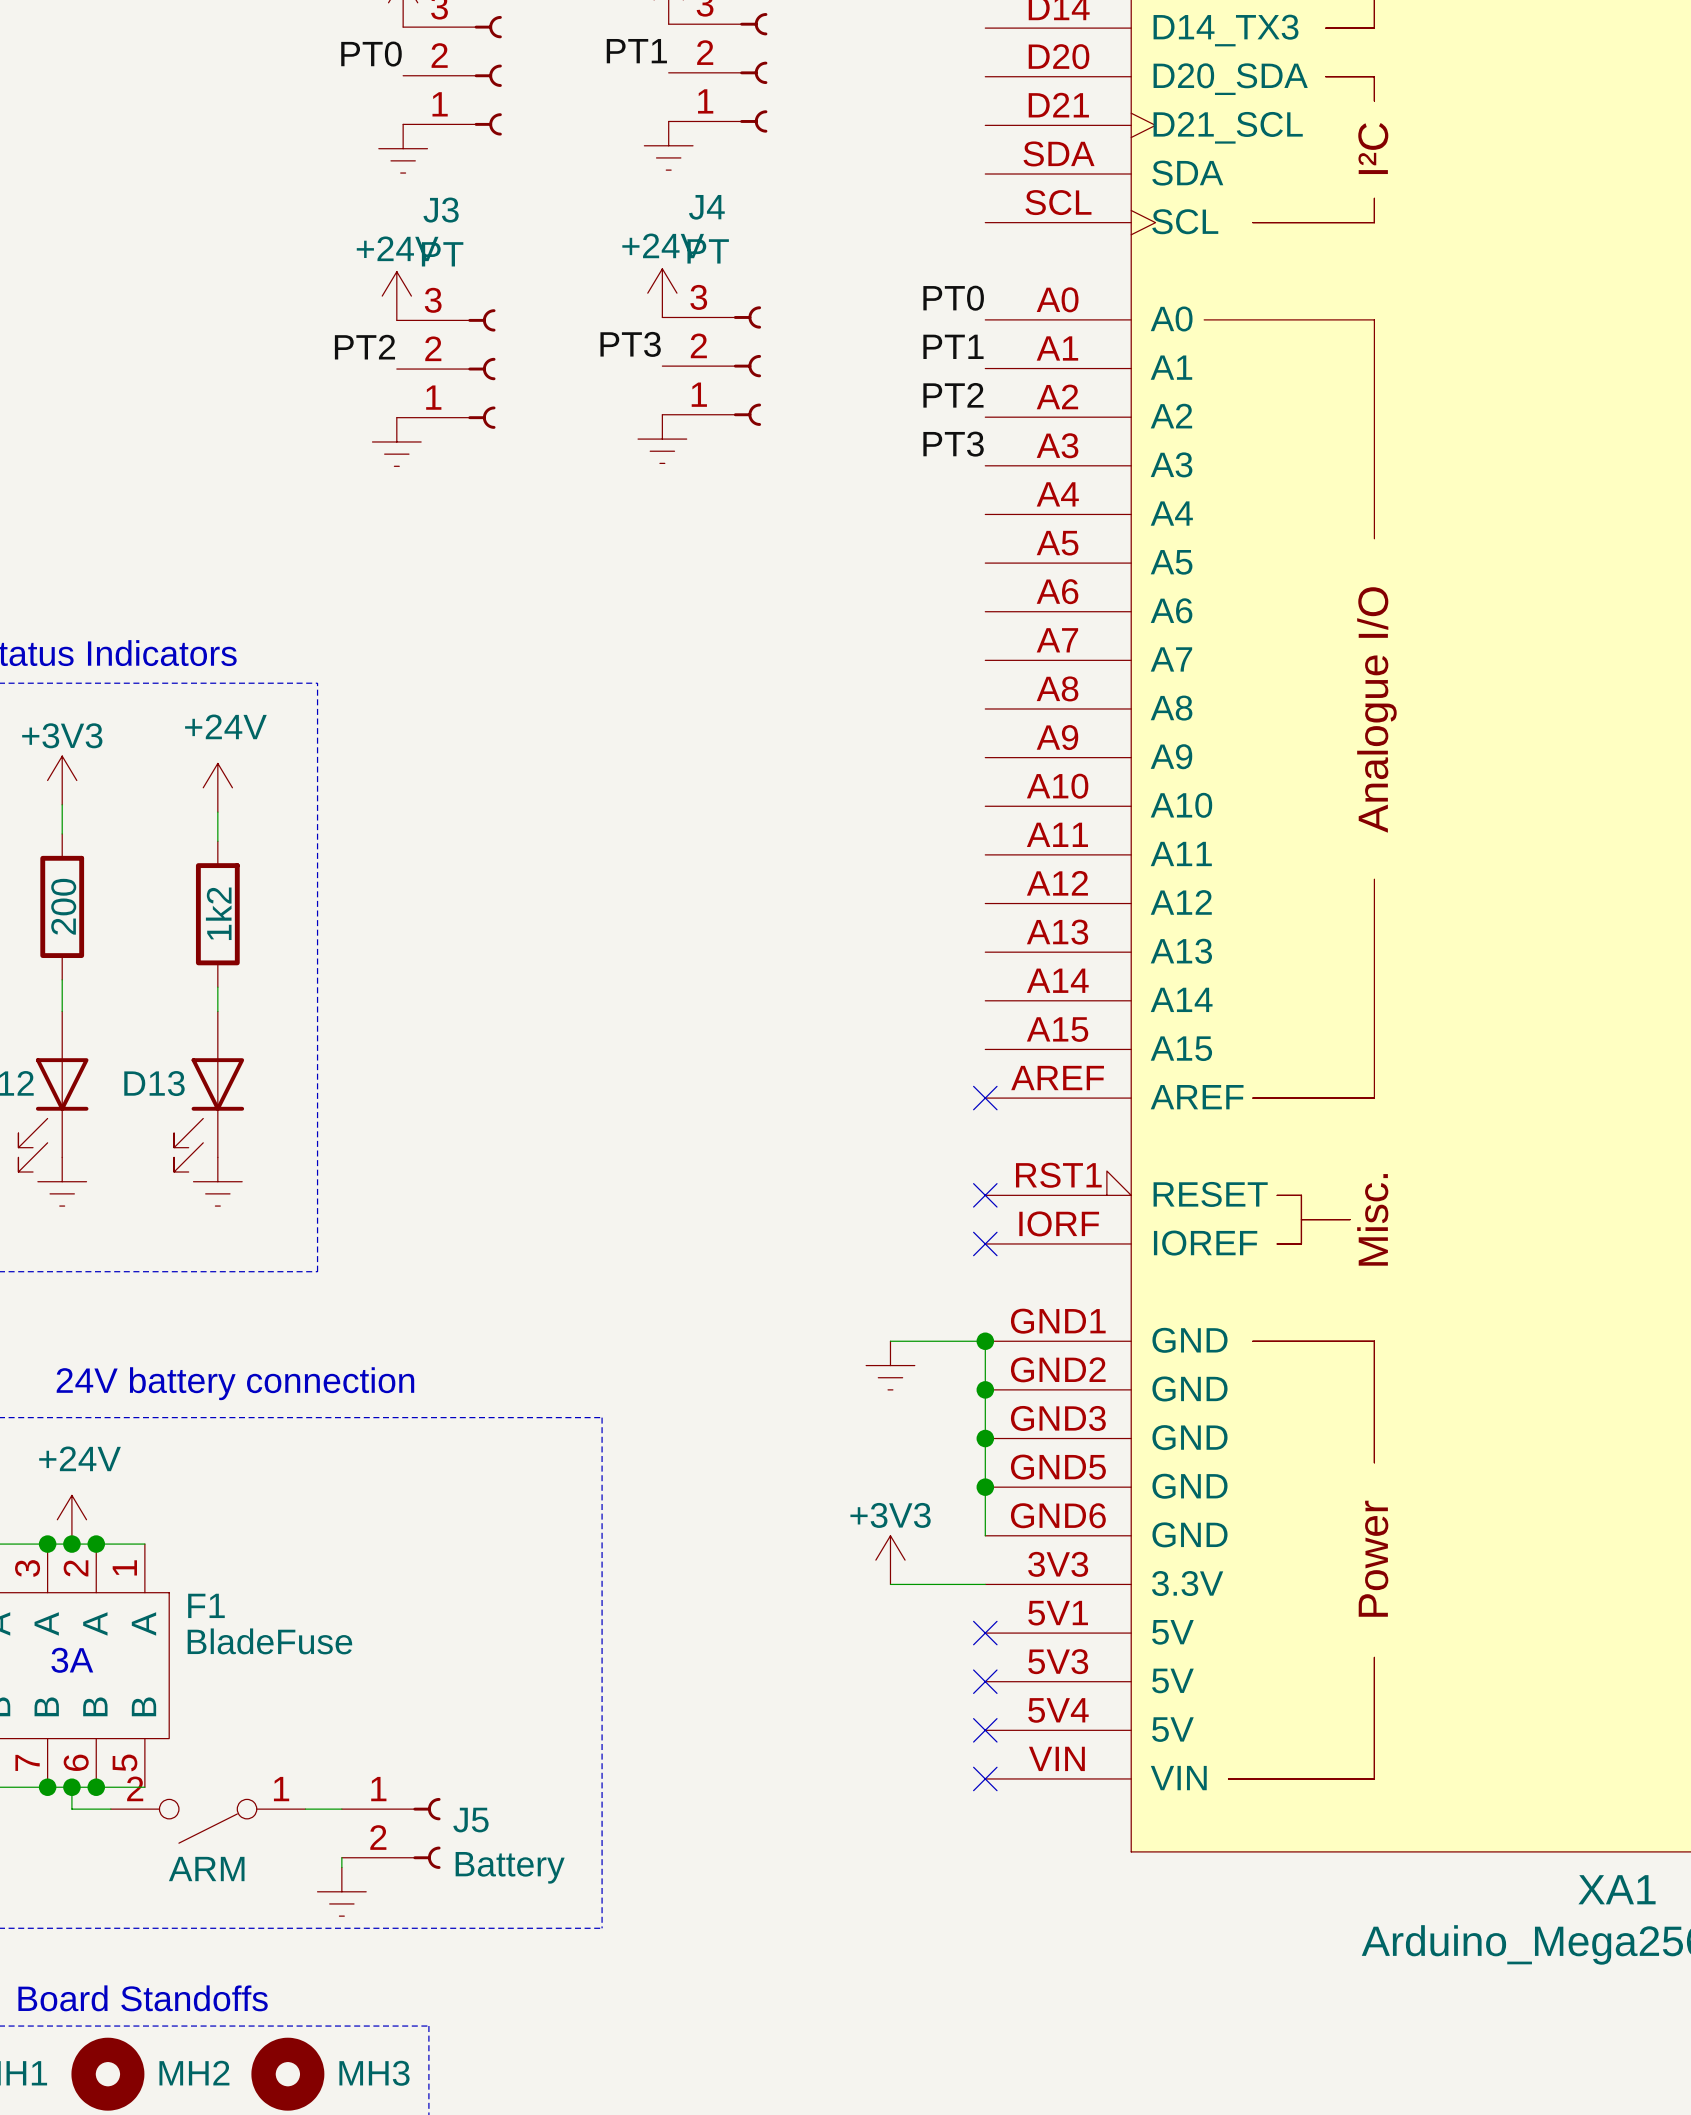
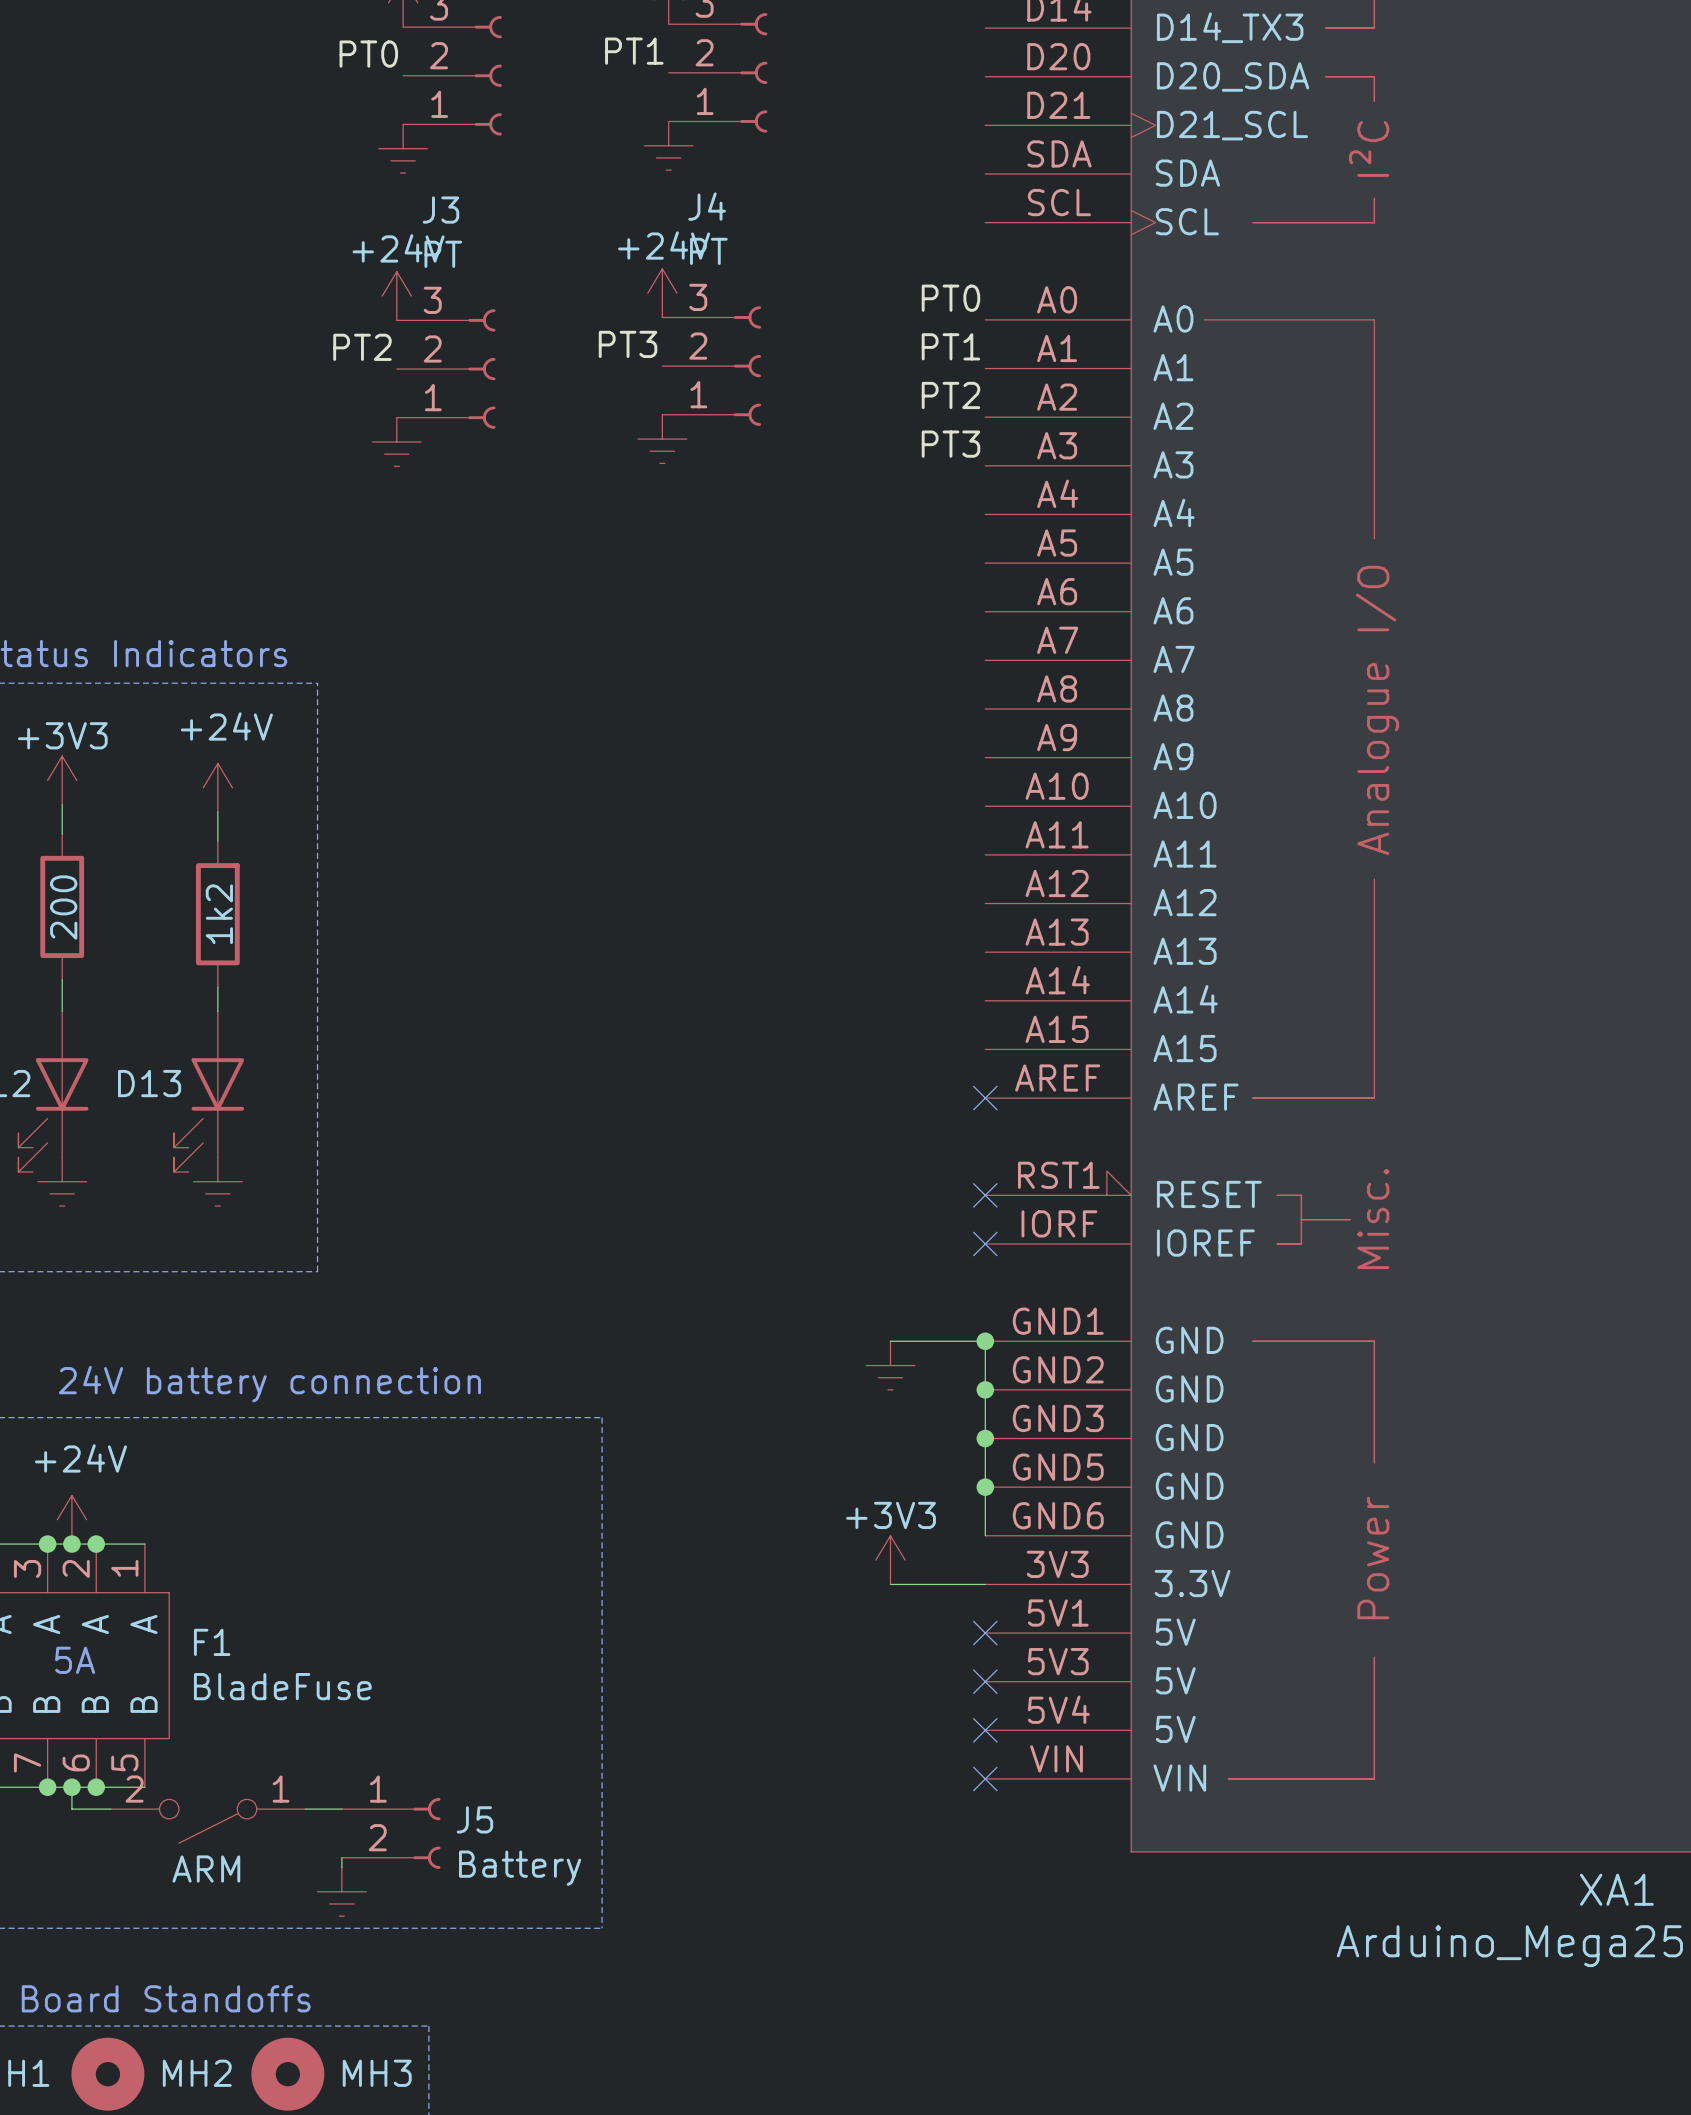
F1 name position: F1 (206, 1605) -> F1 (212, 1642)
F1 value position: BladeFuse (269, 1641) -> BladeFuse (282, 1686)
text: 3A (72, 1660) -> 5A (75, 1660)

